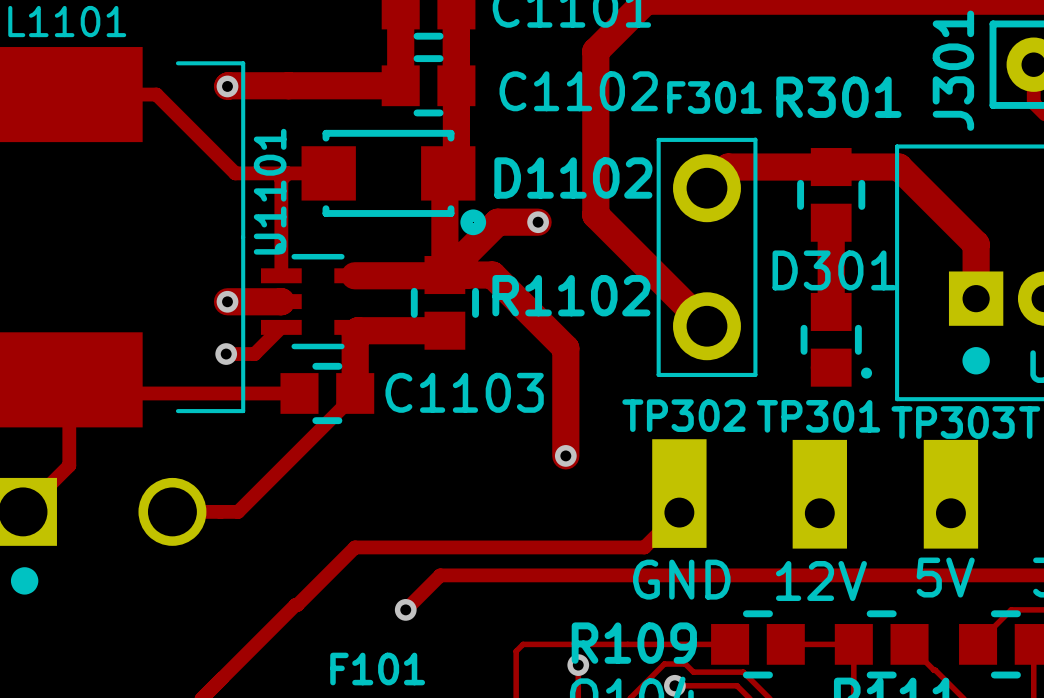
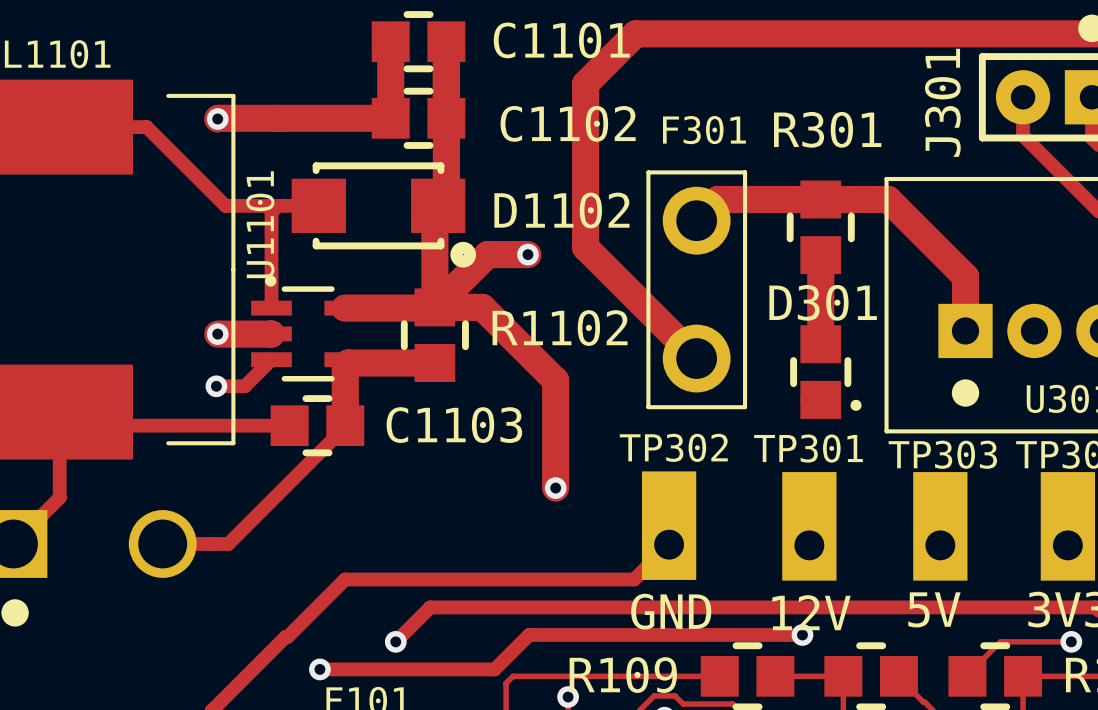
track: none -> (802, 634) (529, 634) (494, 669) (319, 669)
via: none -> (802, 634)
via: none -> (319, 669)

